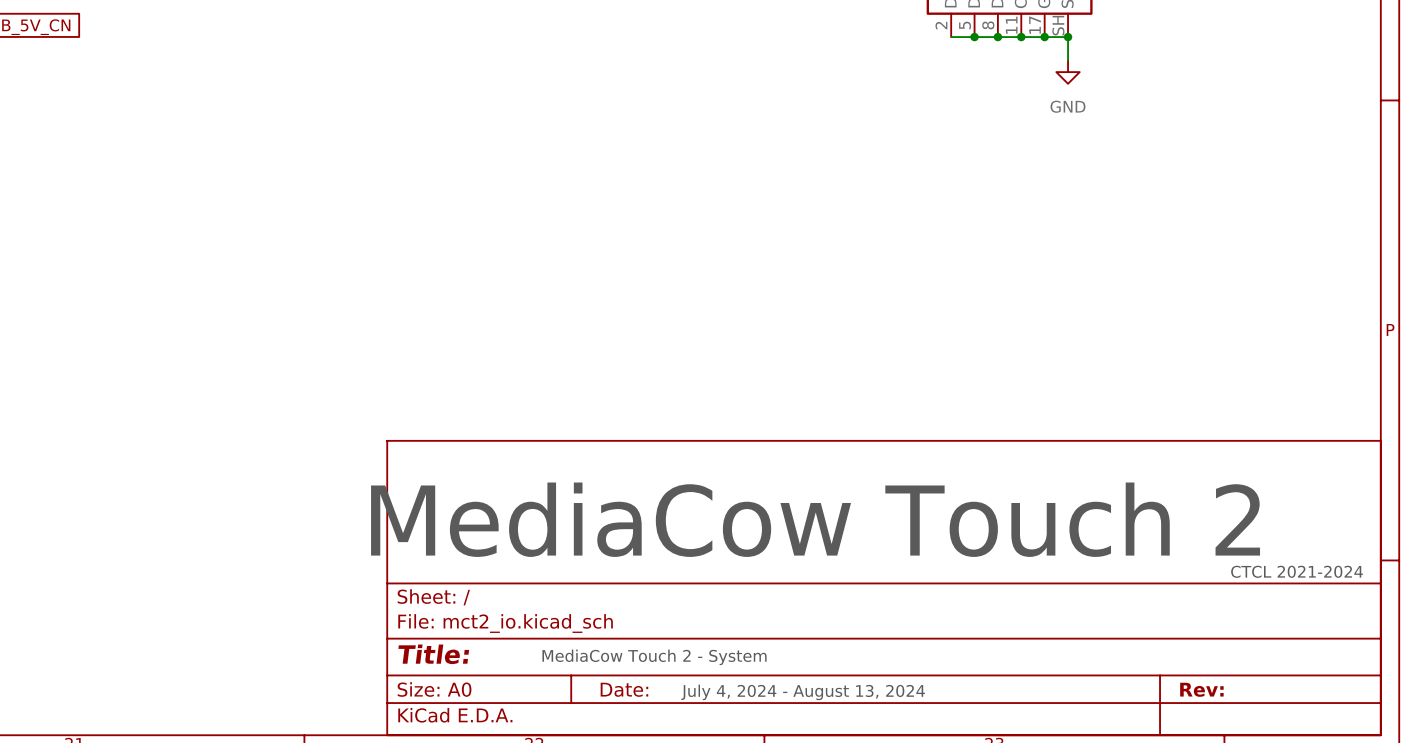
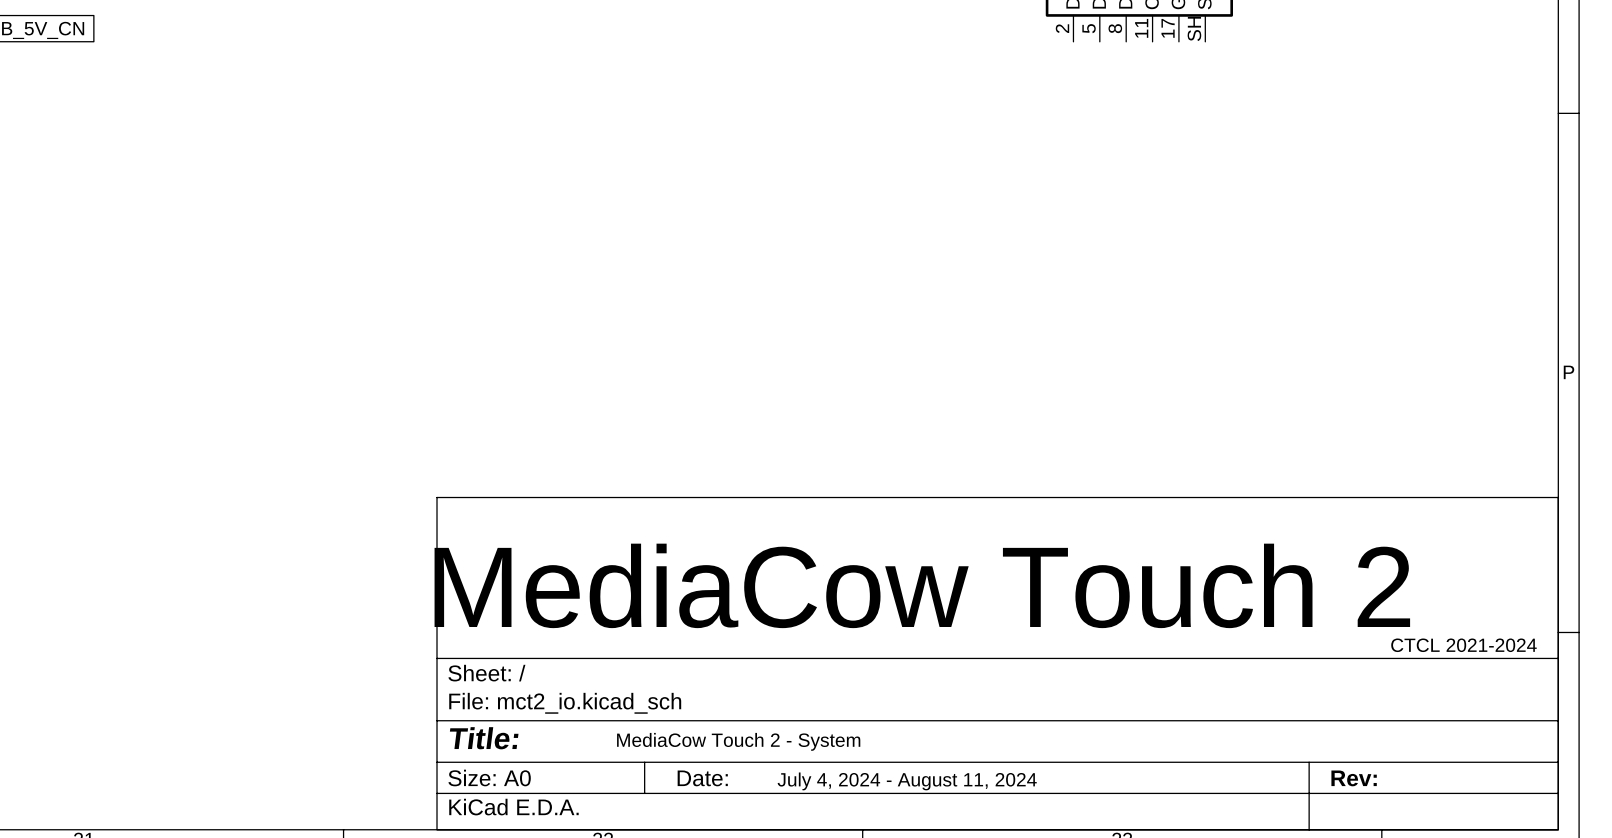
wire: (951, 37) (1068, 37) (1068, 60) -> none
junction: (974, 37) -> none
junction: (997, 37) -> none
junction: (1021, 37) -> none
junction: (1044, 37) -> none
junction: (1068, 37) -> none
power symbol: GND (1068, 72) -> none
text: July 4, 2024 - August 13, 2024 (803, 692) -> July 4, 2024 - August 11, 2024 (907, 781)

